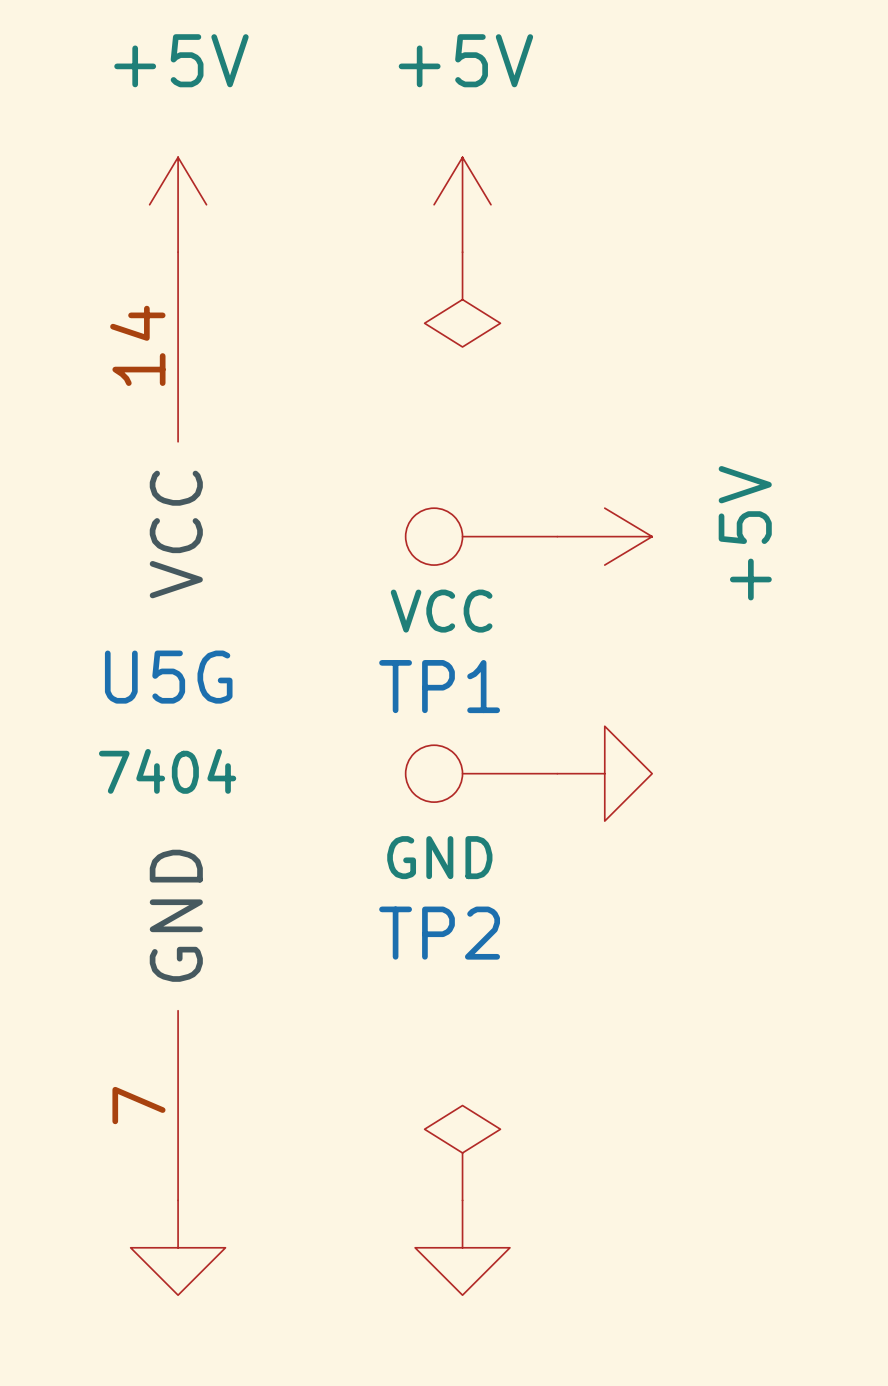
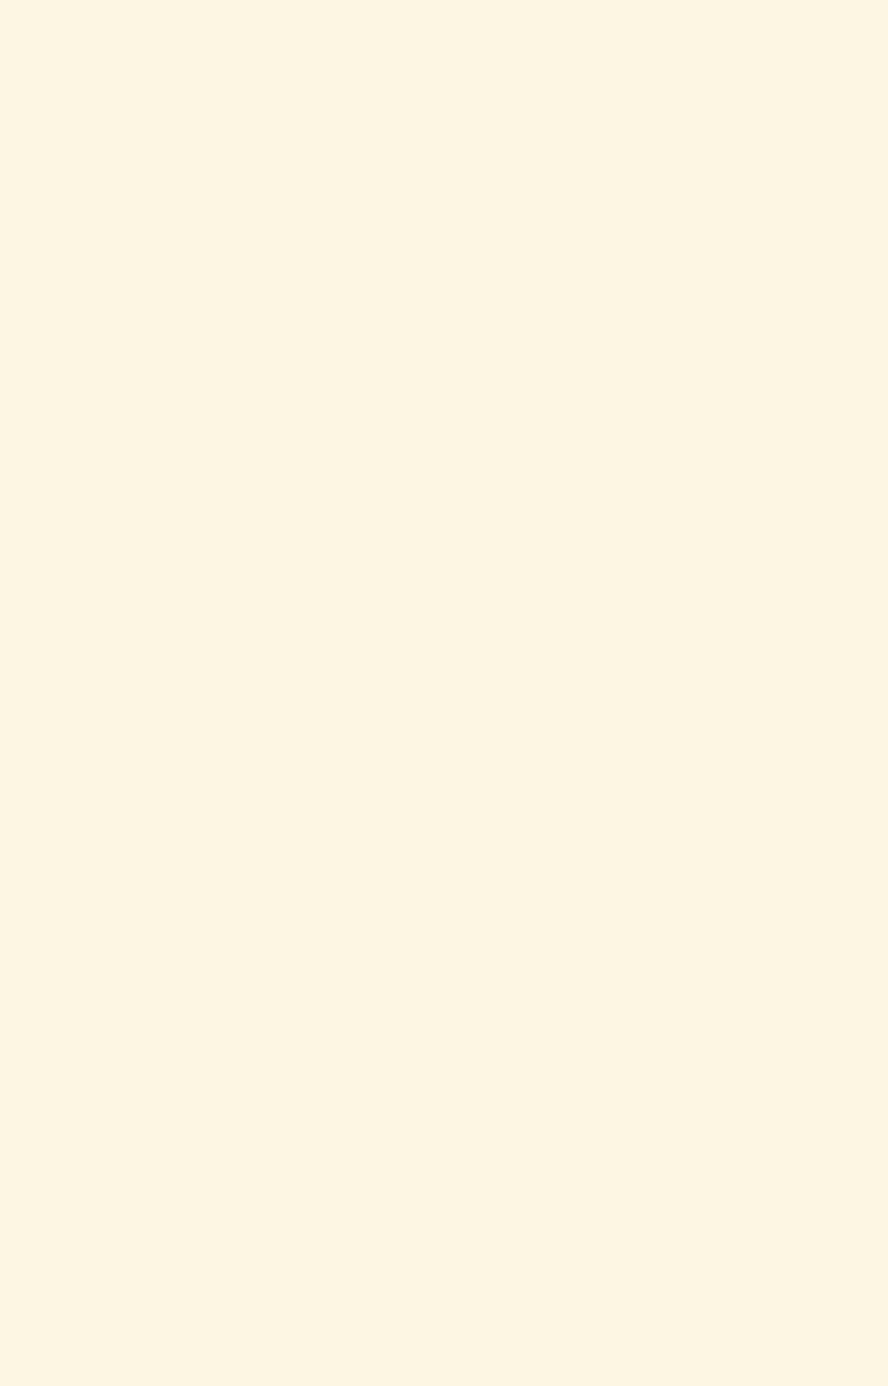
power symbol: +5V (178, 204) -> none
power symbol: +5V (462, 204) -> none
power symbol: (462, 299) -> none
TP1: VCC (481, 536) -> none
power symbol: +5V (604, 536) -> none
U5G: 7404 (178, 726) -> none
TP2: GND (481, 773) -> none
power symbol: (604, 773) -> none
power symbol: (462, 1152) -> none
power symbol: (178, 1247) -> none
power symbol: (462, 1247) -> none

